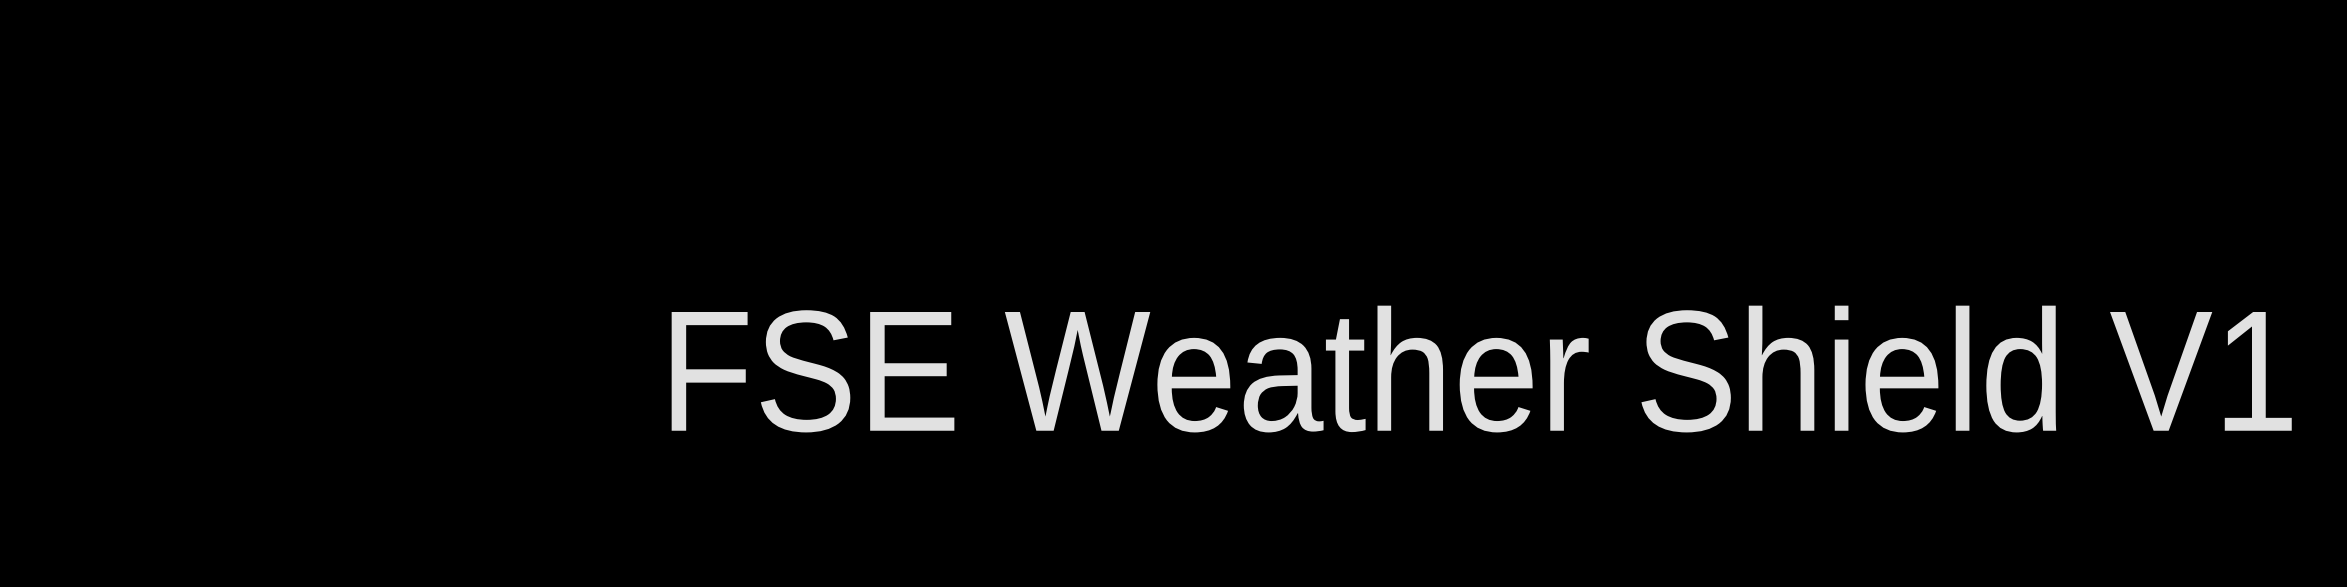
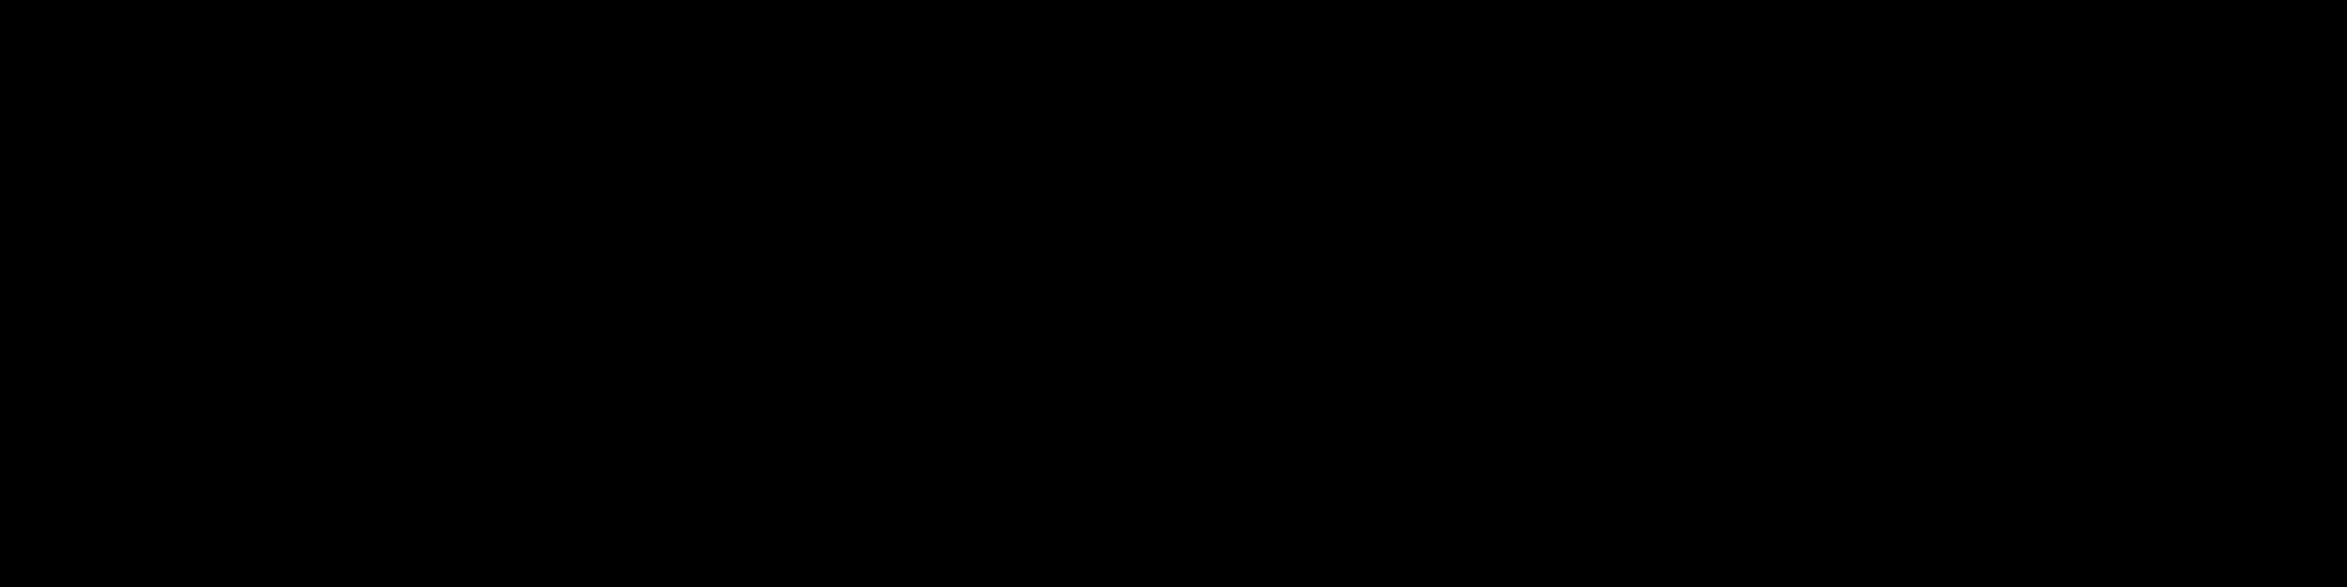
text: FSE Weather Shield V1 (1481, 369) -> none

